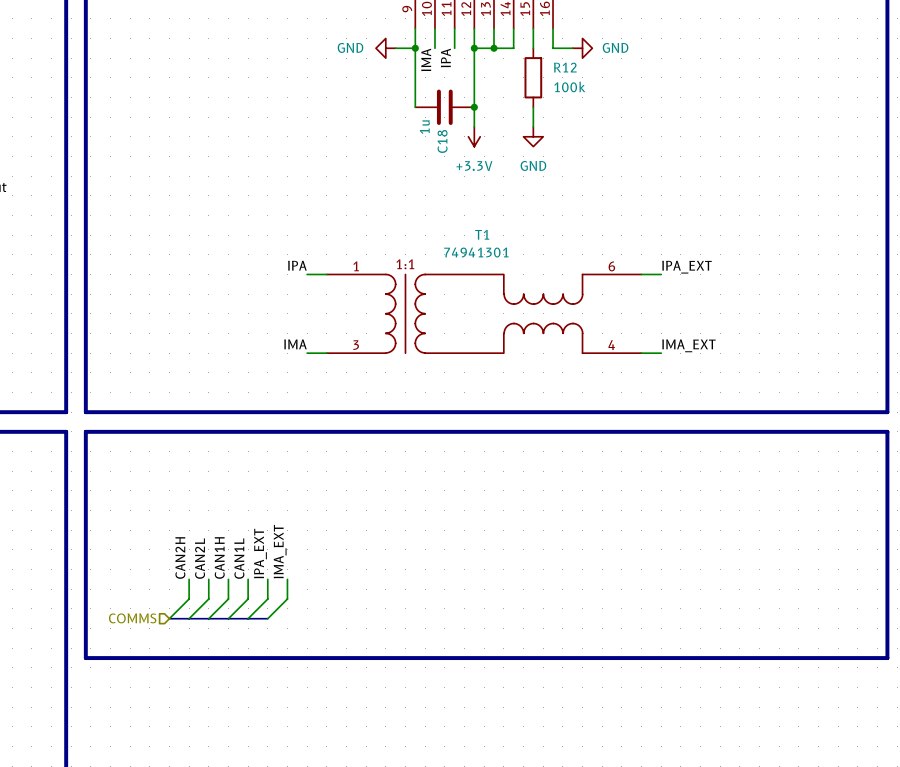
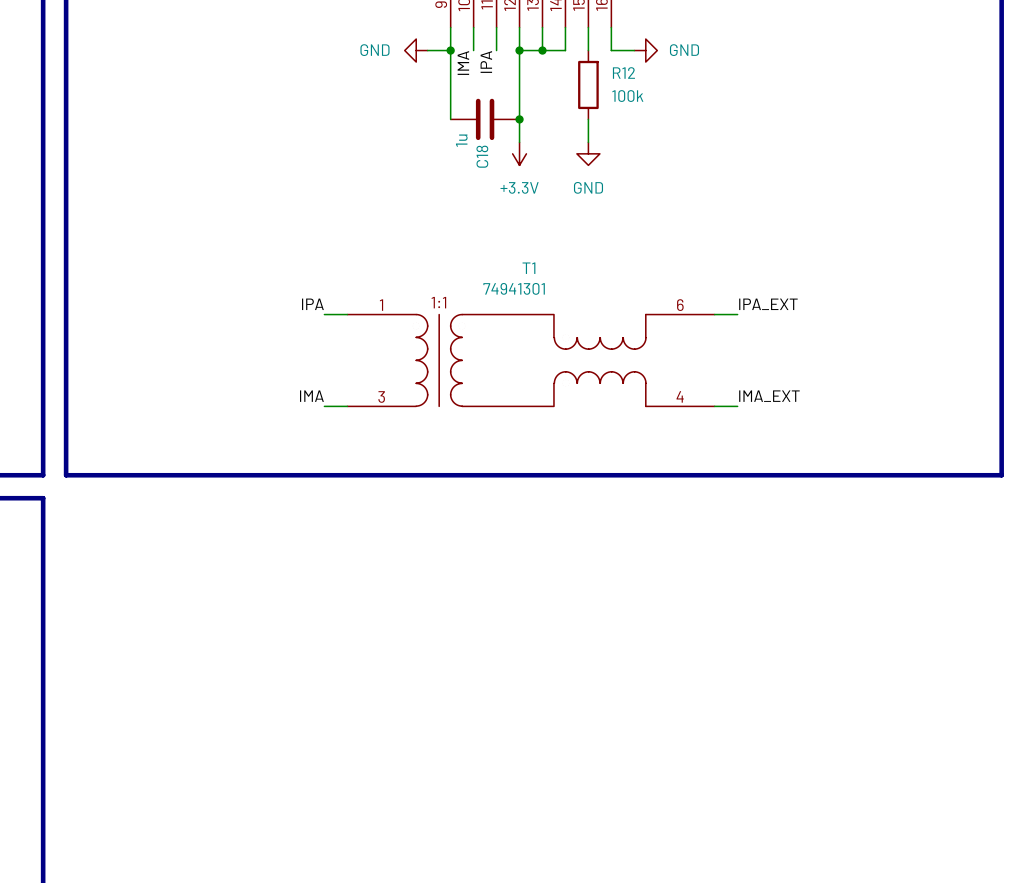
line: (85, 431) (887, 431) (887, 658) (85, 658) (85, 431) -> none
label: IMA_EXT (280, 551) -> none
label: IPA_EXT (260, 553) -> none
label: CAN2H (180, 557) -> none
label: CAN1H (219, 557) -> none
label: CAN2L (200, 558) -> none
label: CAN1L (239, 558) -> none
wire: (189, 579) (189, 599) (169, 618) -> none
wire: (208, 579) (208, 599) (189, 618) -> none
wire: (228, 579) (228, 599) (208, 618) -> none
wire: (248, 579) (248, 599) (228, 618) -> none
wire: (267, 579) (267, 599) (248, 618) -> none
wire: (287, 579) (287, 599) (267, 618) -> none
hierarchical label: COMMS (132, 618) -> none
bus: (169, 618) (267, 618) -> none

